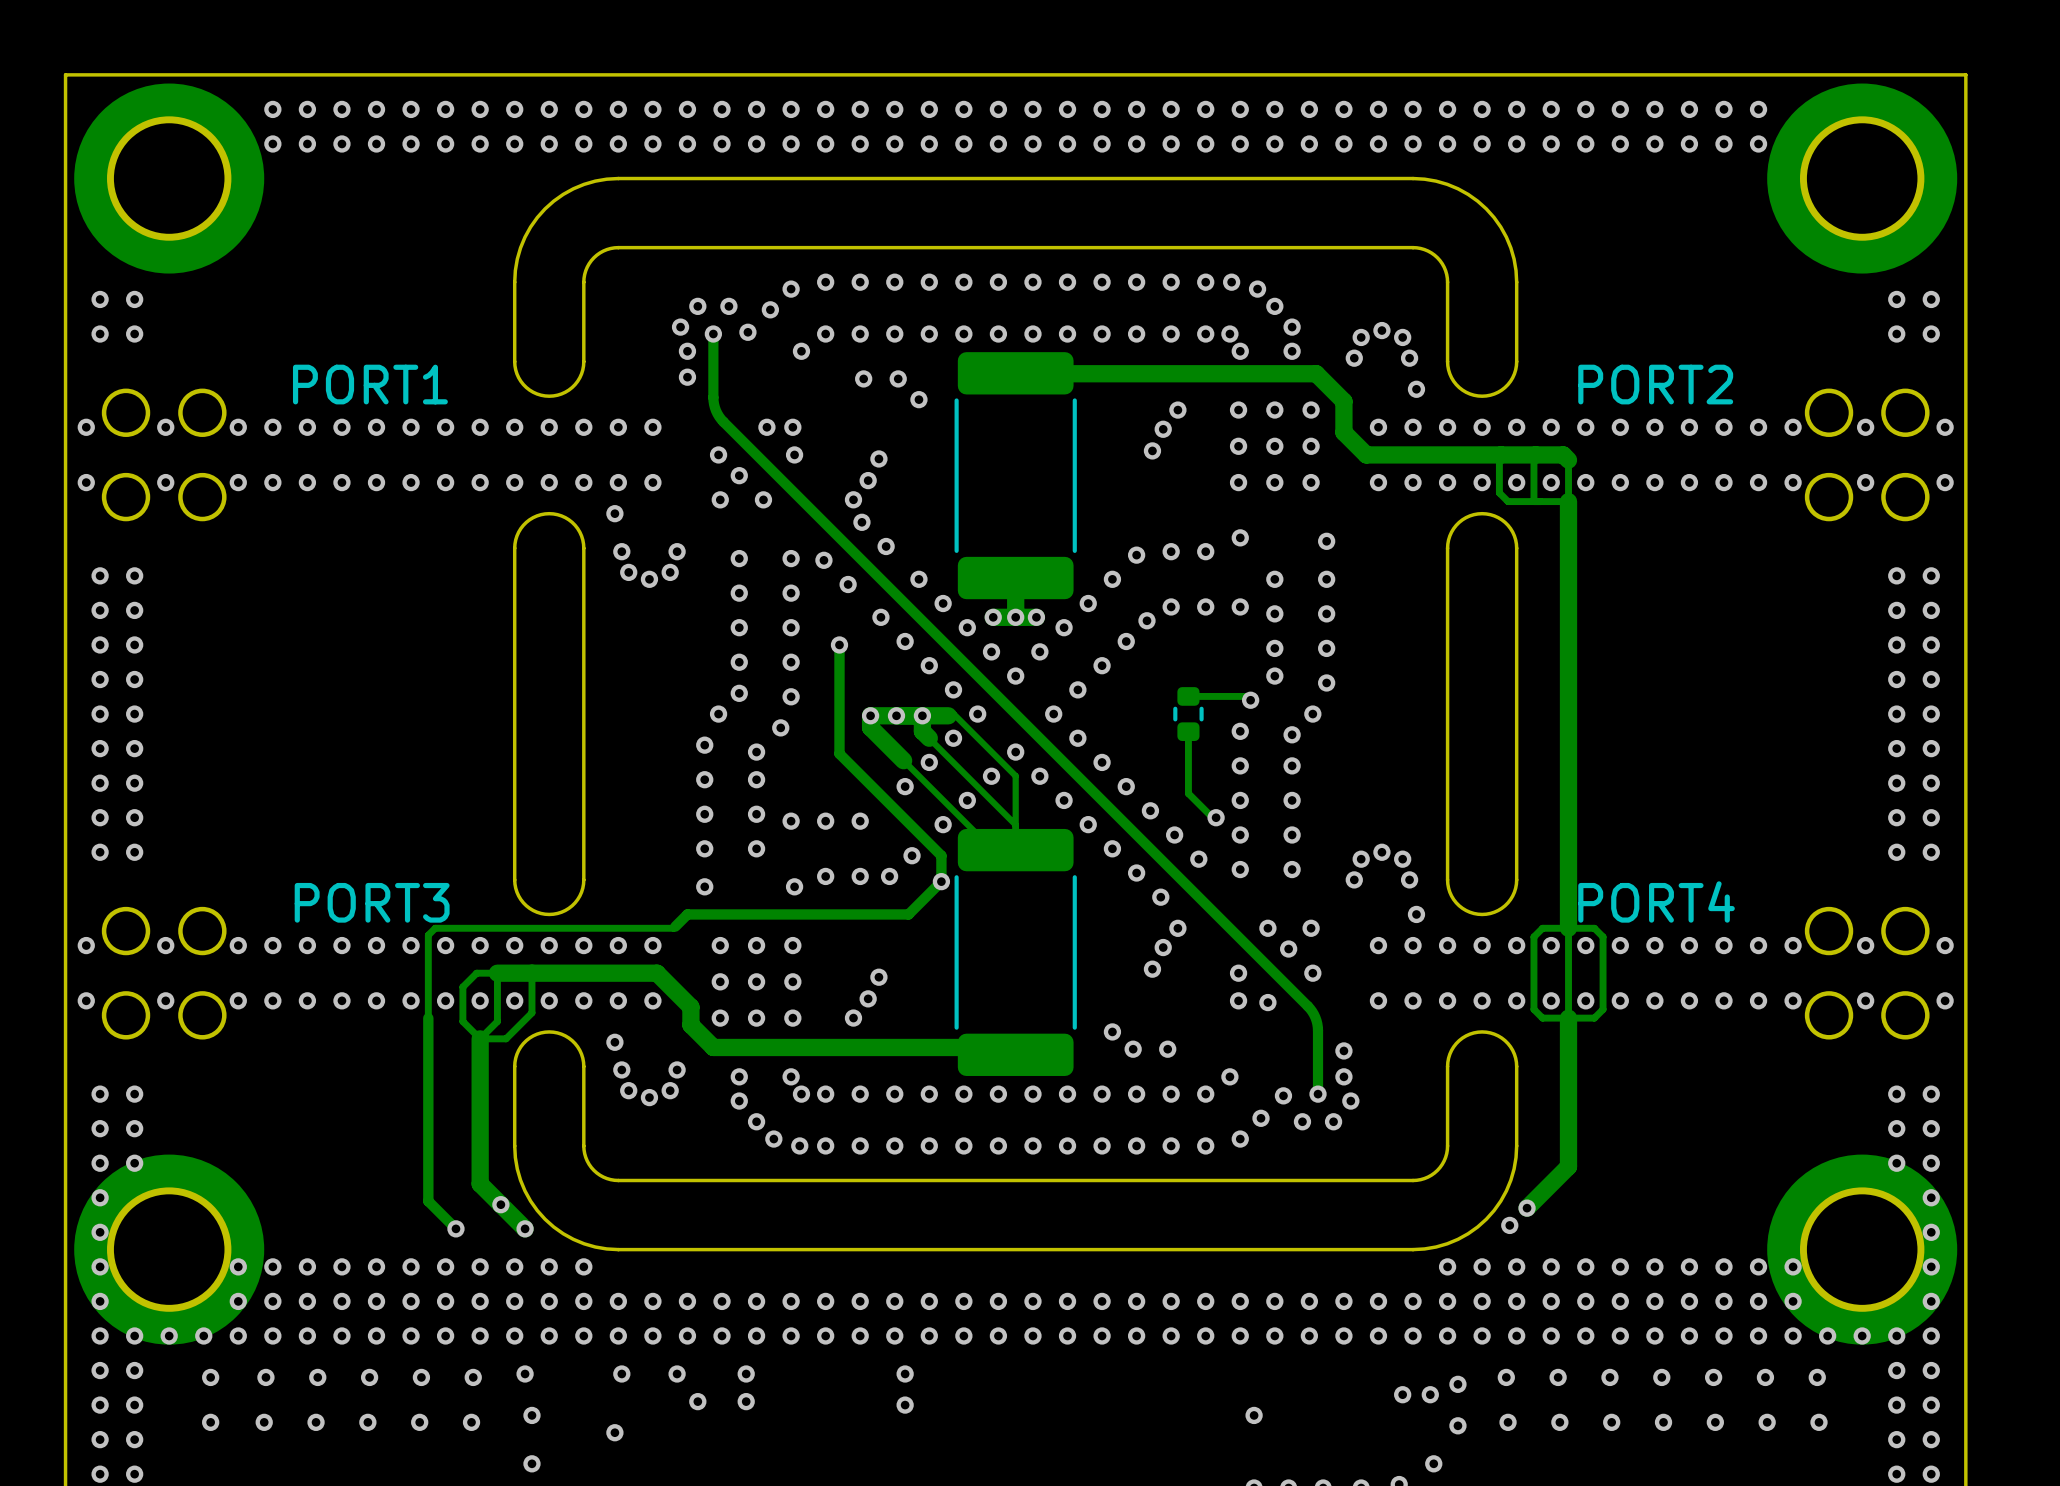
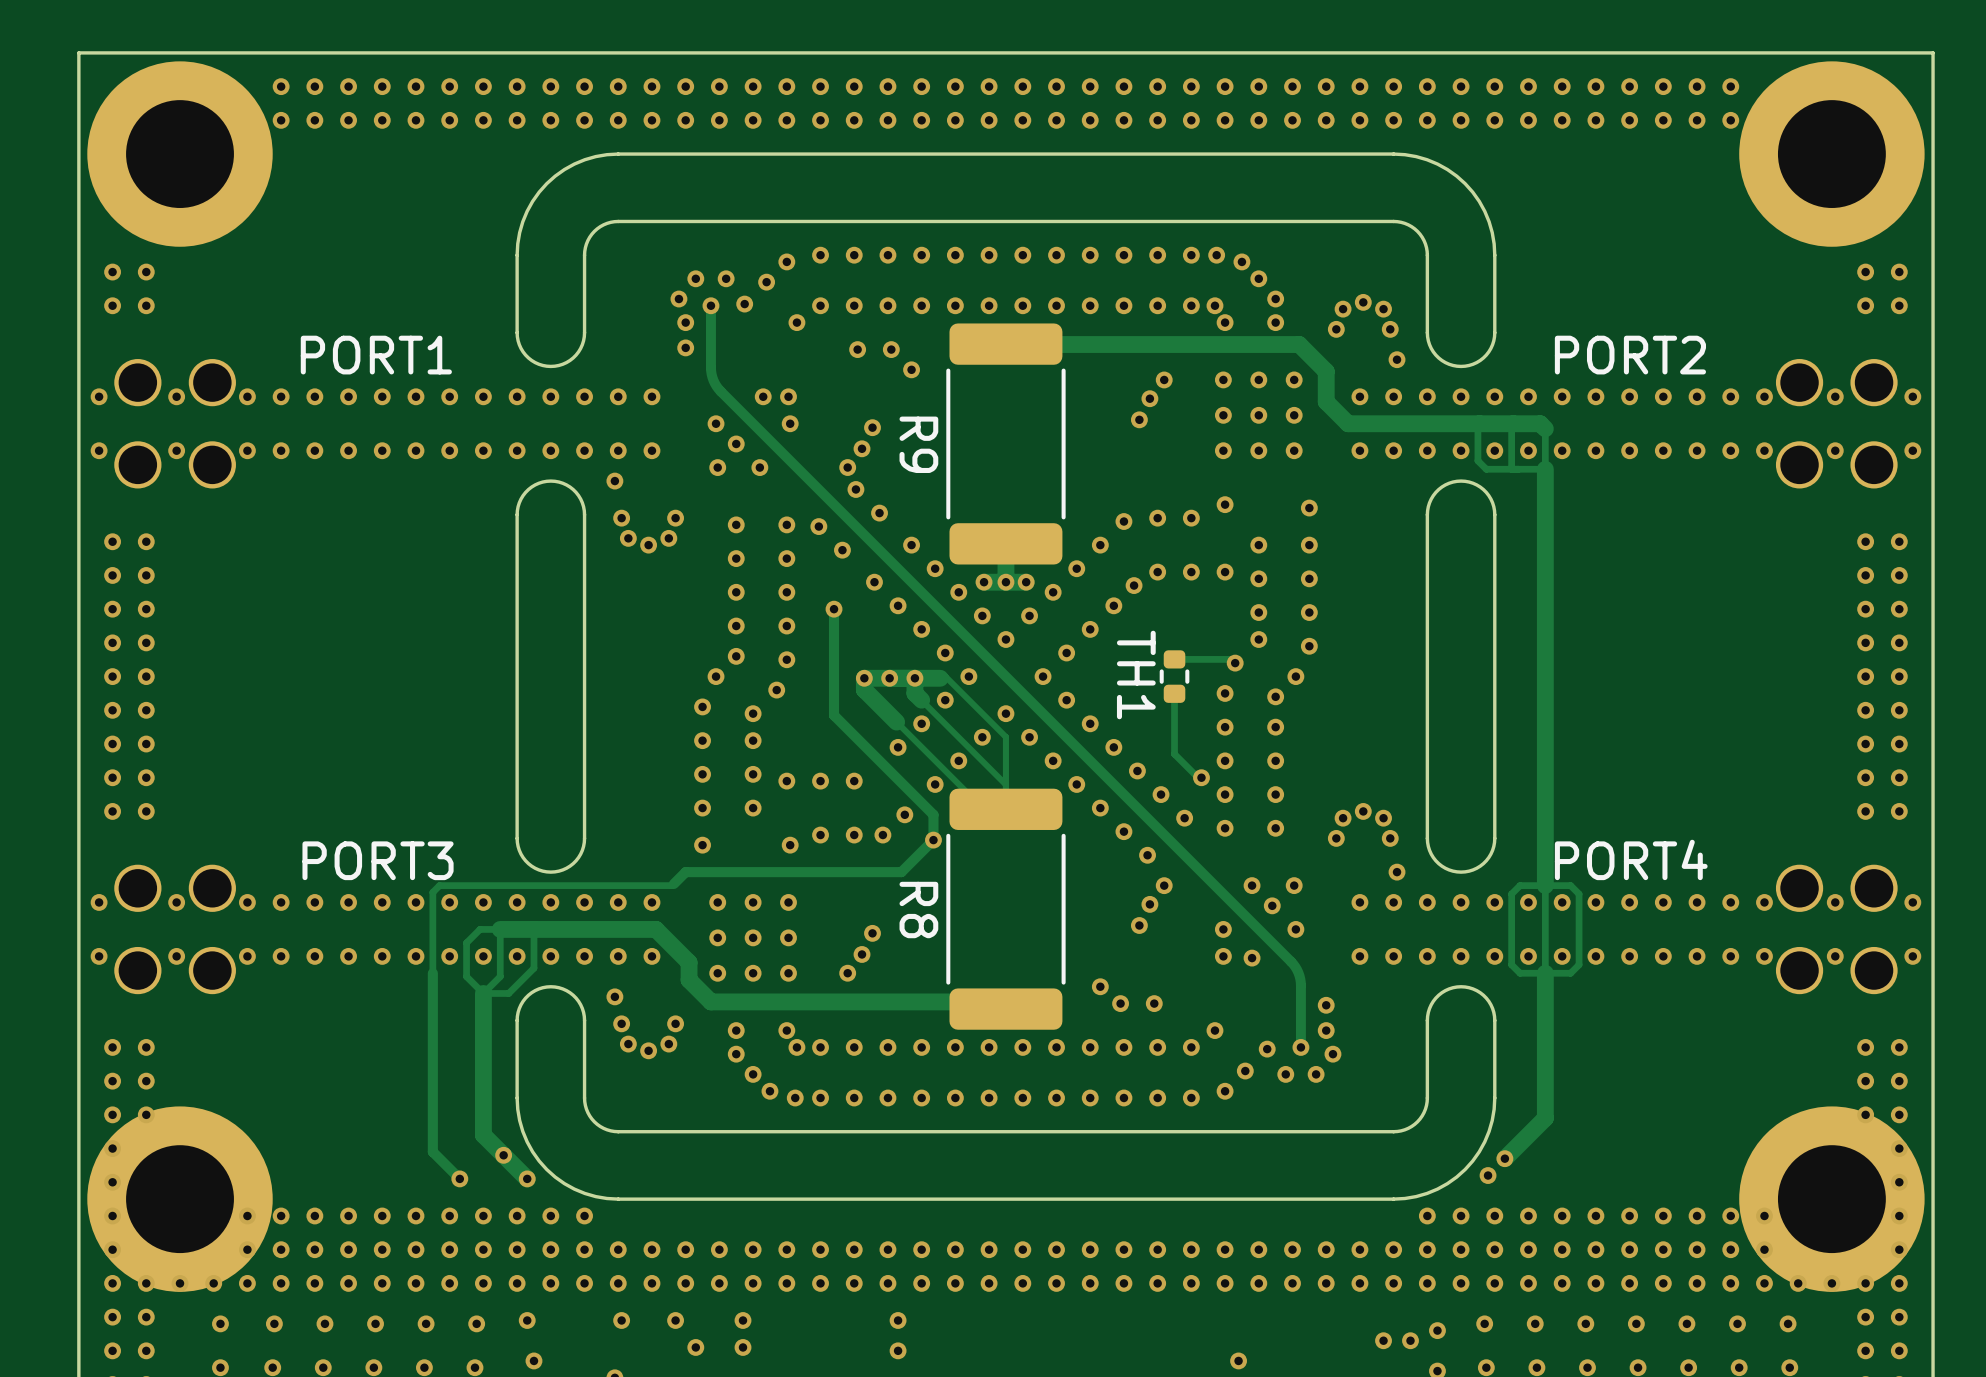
R9 name: none -> R9 (918, 444)
TH1 name: none -> TH1 (1136, 674)
R8 name: none -> R8 (918, 910)

